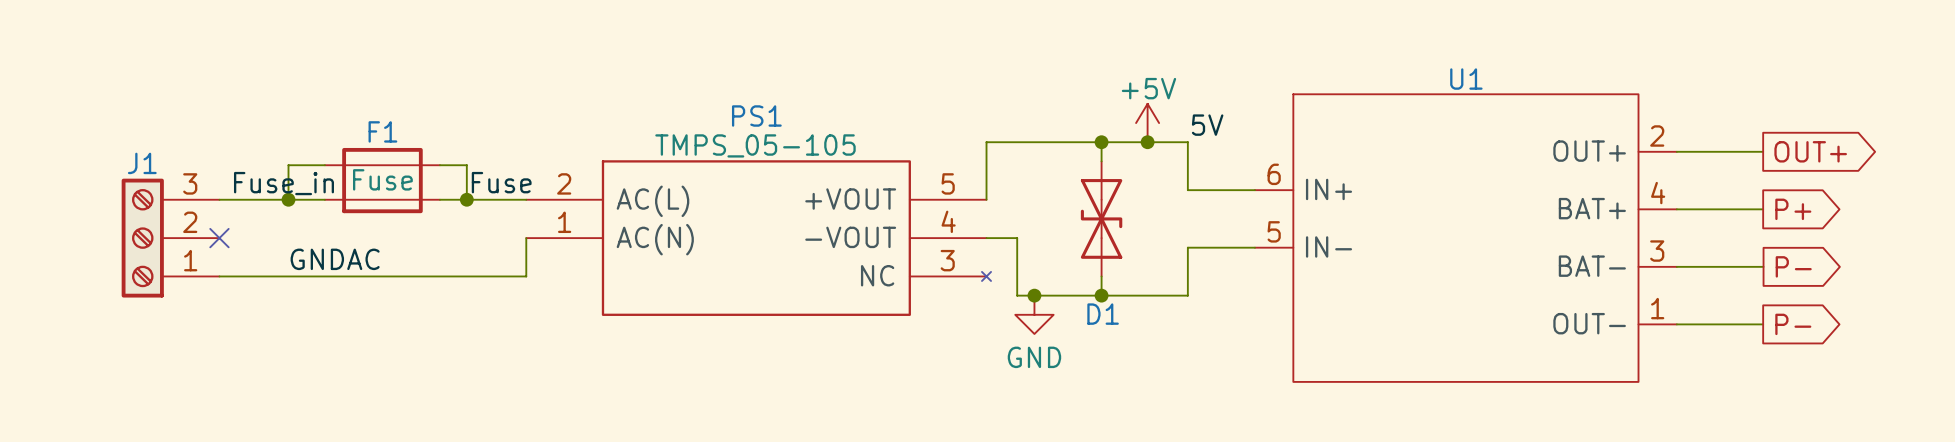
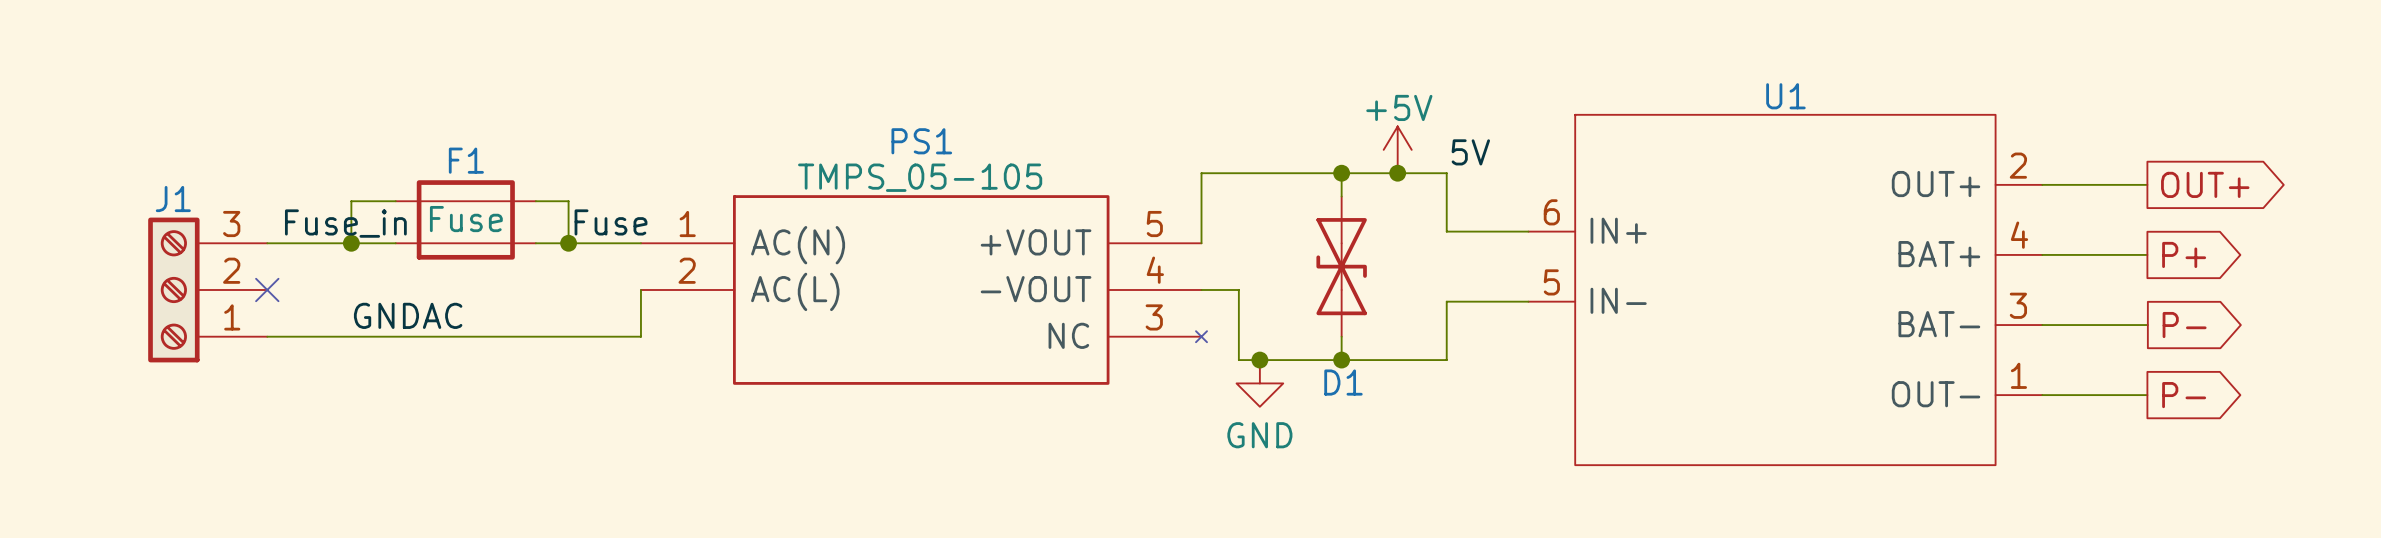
PS1 pin number: 2 (564, 183) -> 1 (687, 224)
PS1 pin name: AC(L) (652, 201) -> AC(N) (798, 245)
PS1 pin number: 1 (564, 222) -> 2 (687, 270)
PS1 pin name: AC(N) (655, 239) -> AC(L) (795, 291)

